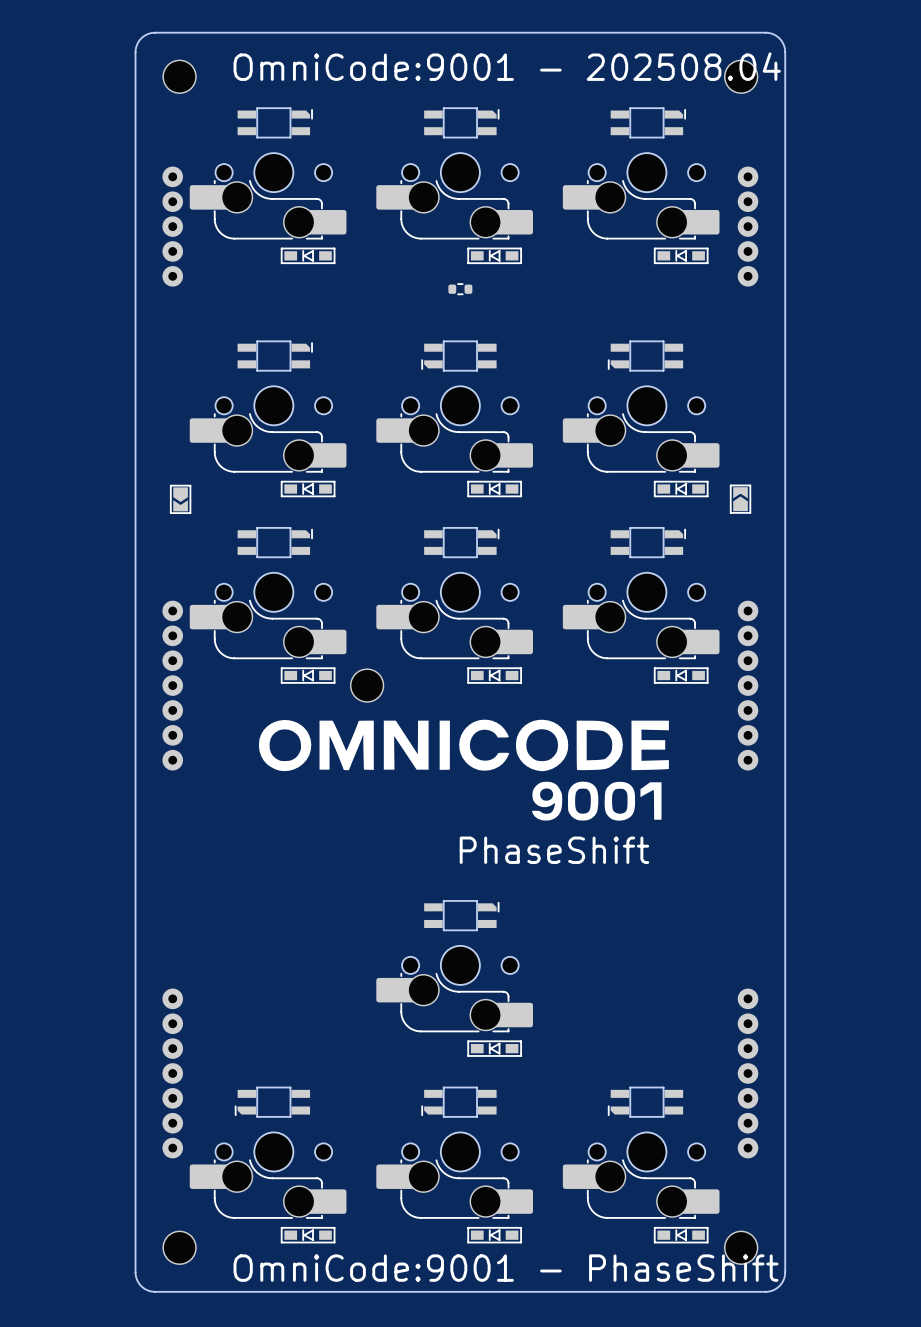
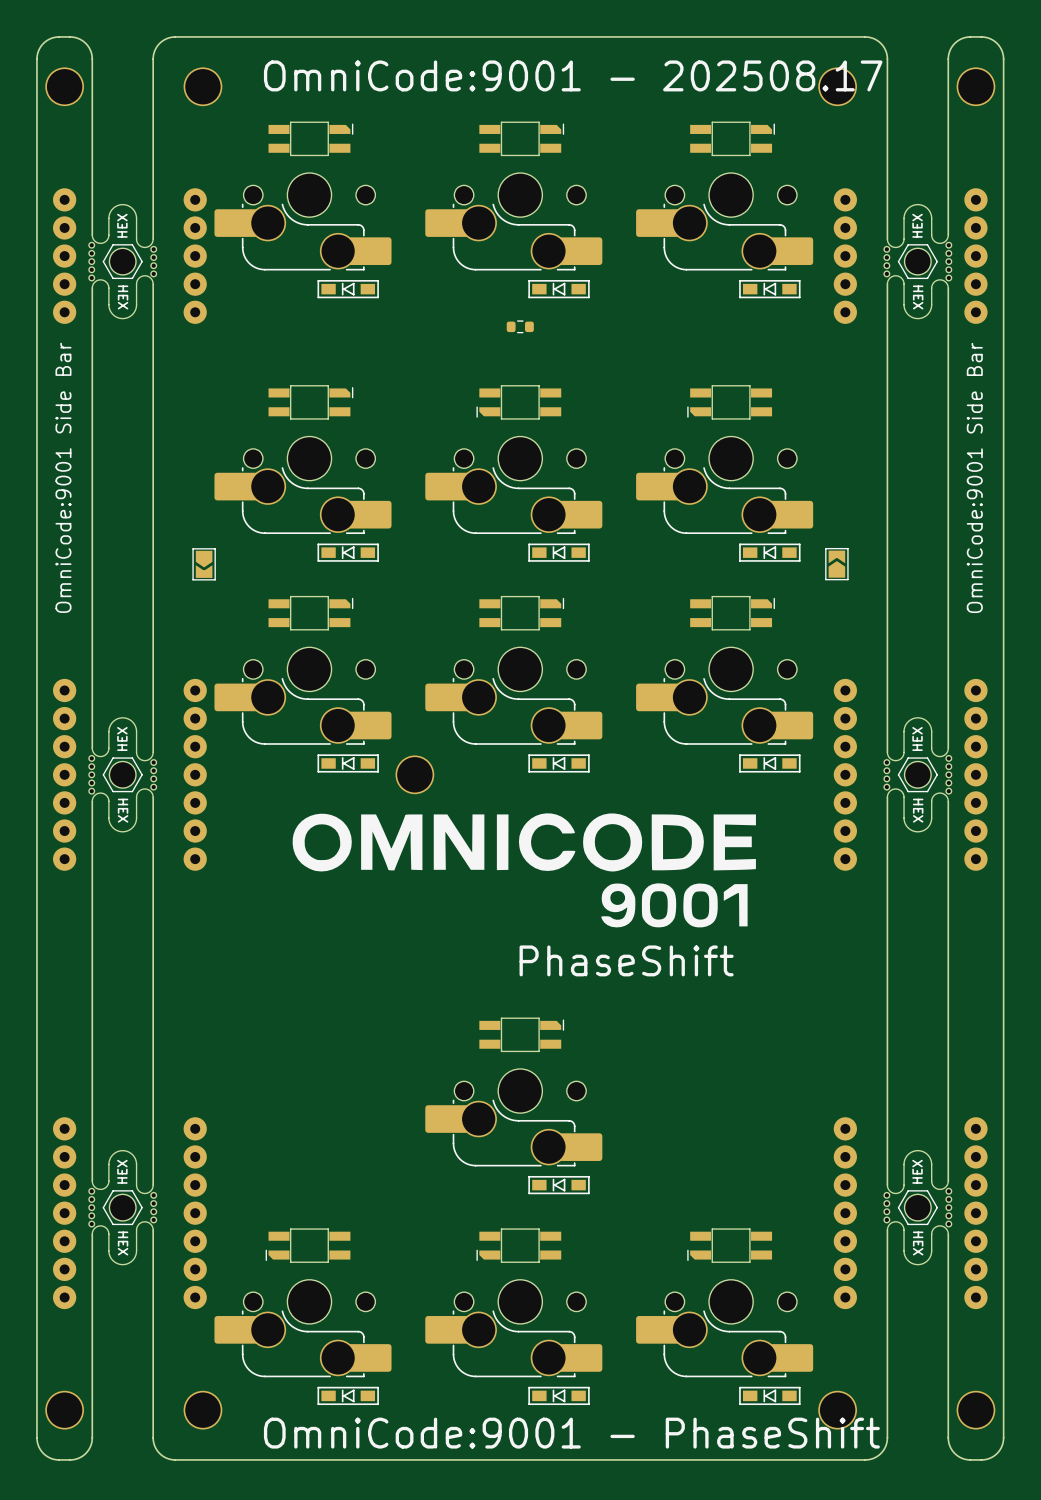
text: OmniCode:9001 - 202508.04 (507, 66) -> OmniCode:9001 - 202508.17 (573, 75)
part: none -> (64, 86)
part: none -> (975, 86)
board edge: none -> (92, 235) (91, 54) (87, 45) (79, 39) (72, 37) (54, 37) (41, 45) (36, 59) (36, 1437) (39, 1447) (43, 1453) (56, 1459) (79, 1457) (88, 1449) (92, 1440) (92, 1234)
board edge: none -> (948, 235) (948, 54) (953, 45) (960, 39) (967, 37) (986, 37) (998, 45) (1003, 59) (1003, 1437) (1001, 1447) (997, 1453) (983, 1459) (960, 1457) (951, 1449) (948, 1440) (948, 1234)
board edge: (135, 211) (135, 251) -> none
board edge: (785, 211) (785, 251) -> none
part: none -> (64, 256)
part: none -> (975, 256)
part: none -> (122, 261)
part: none -> (917, 261)
board edge: none -> (92, 288) (92, 748)
board edge: none -> (948, 288) (948, 748)
text: none -> OmniCode:9001 Side Bar (63, 477)
text: none -> OmniCode:9001 Side Bar (974, 477)
board edge: (135, 665) (135, 705) -> none
board edge: (785, 665) (785, 705) -> none
part: none -> (64, 774)
part: none -> (122, 774)
part: none -> (917, 774)
part: none -> (975, 774)
board edge: none -> (92, 801) (92, 1181)
board edge: none -> (948, 801) (948, 1181)
board edge: (135, 1048) (135, 1088) -> none
board edge: (785, 1048) (785, 1088) -> none
part: none -> (122, 1207)
part: none -> (917, 1207)
part: none -> (64, 1213)
part: none -> (975, 1213)
part: none -> (64, 1410)
part: none -> (975, 1410)

